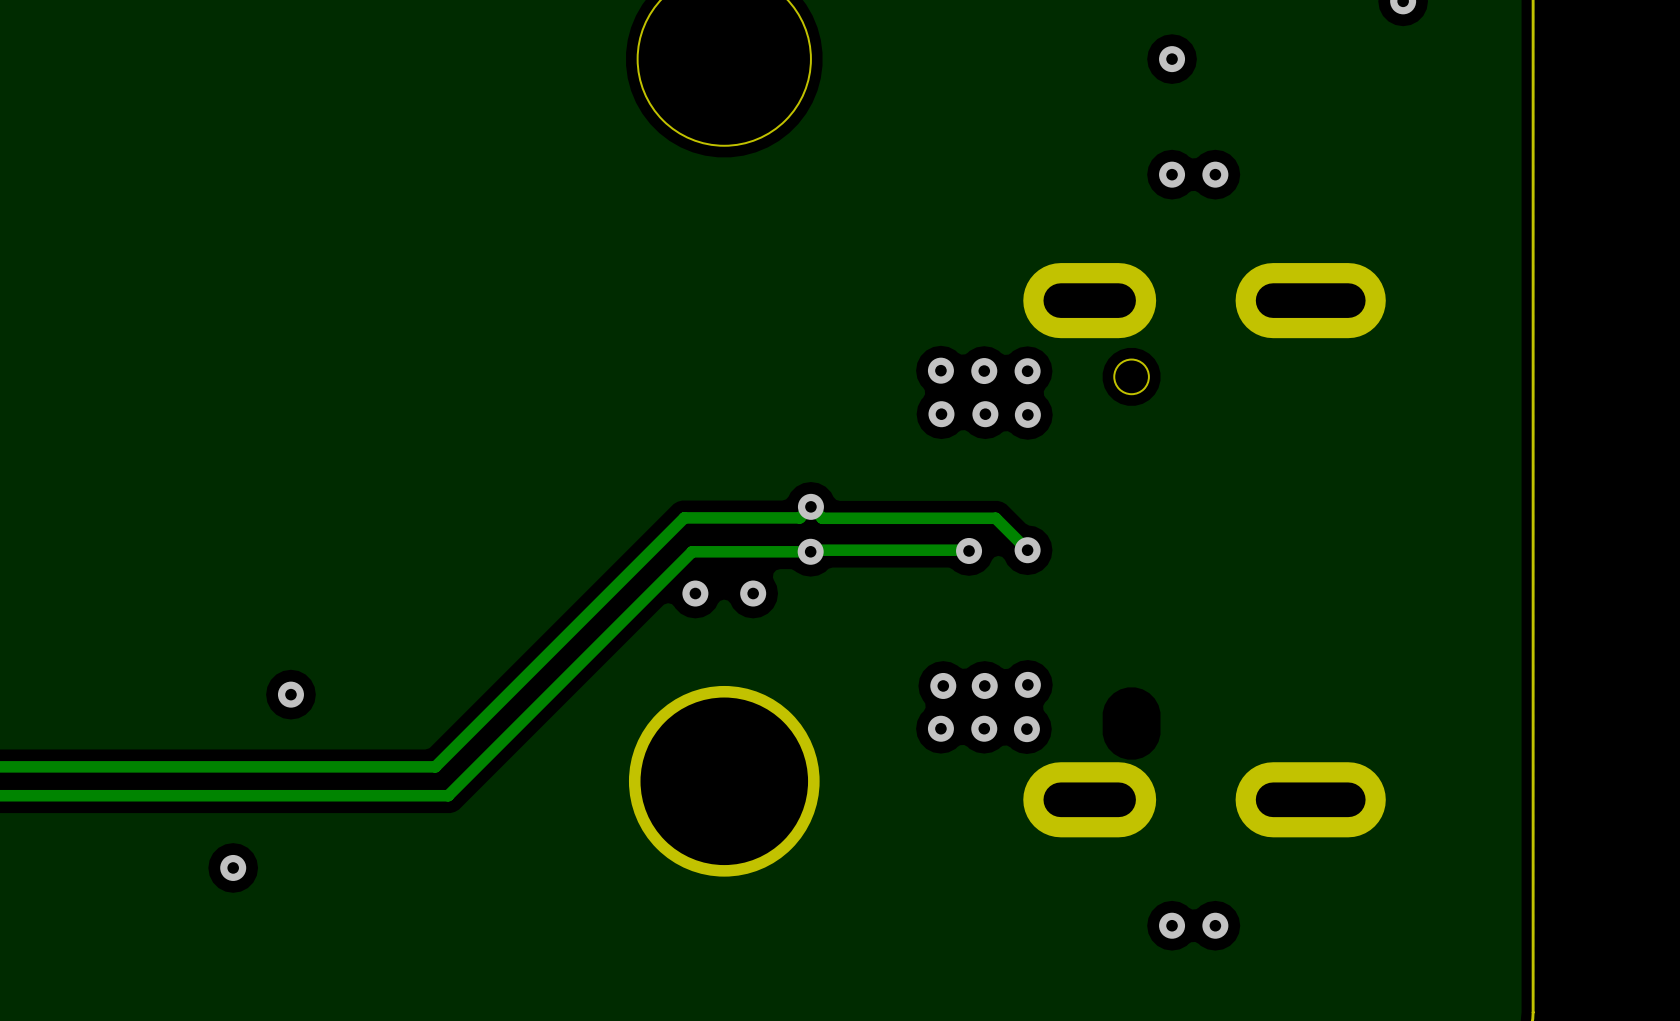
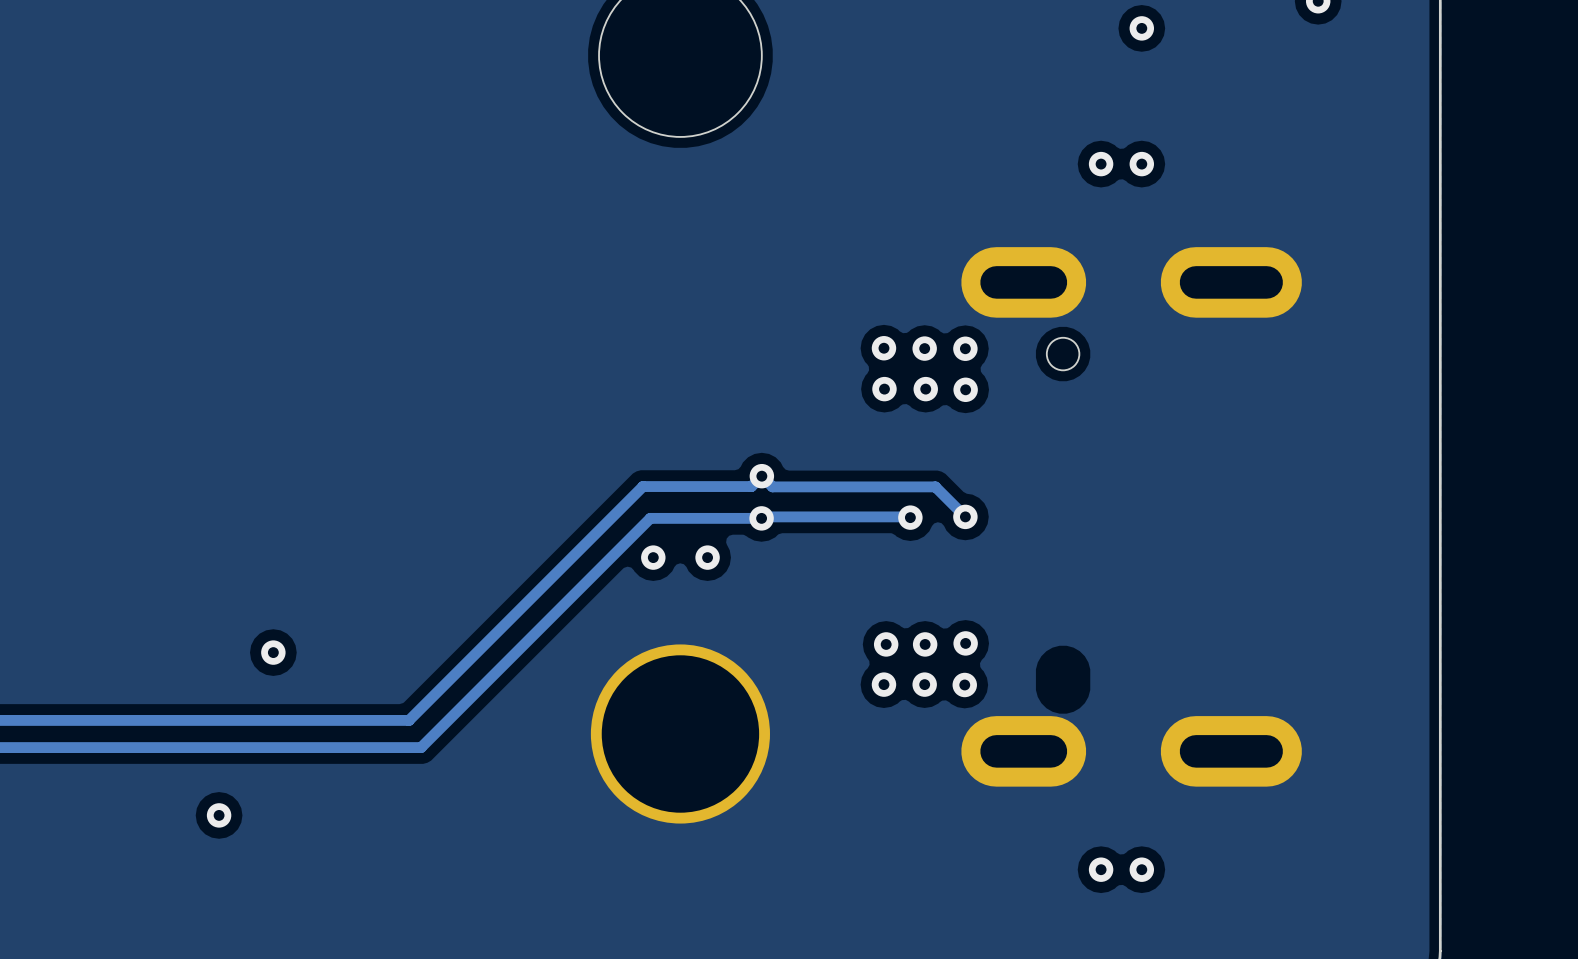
via position: (1172, 59) -> (1141, 28)

